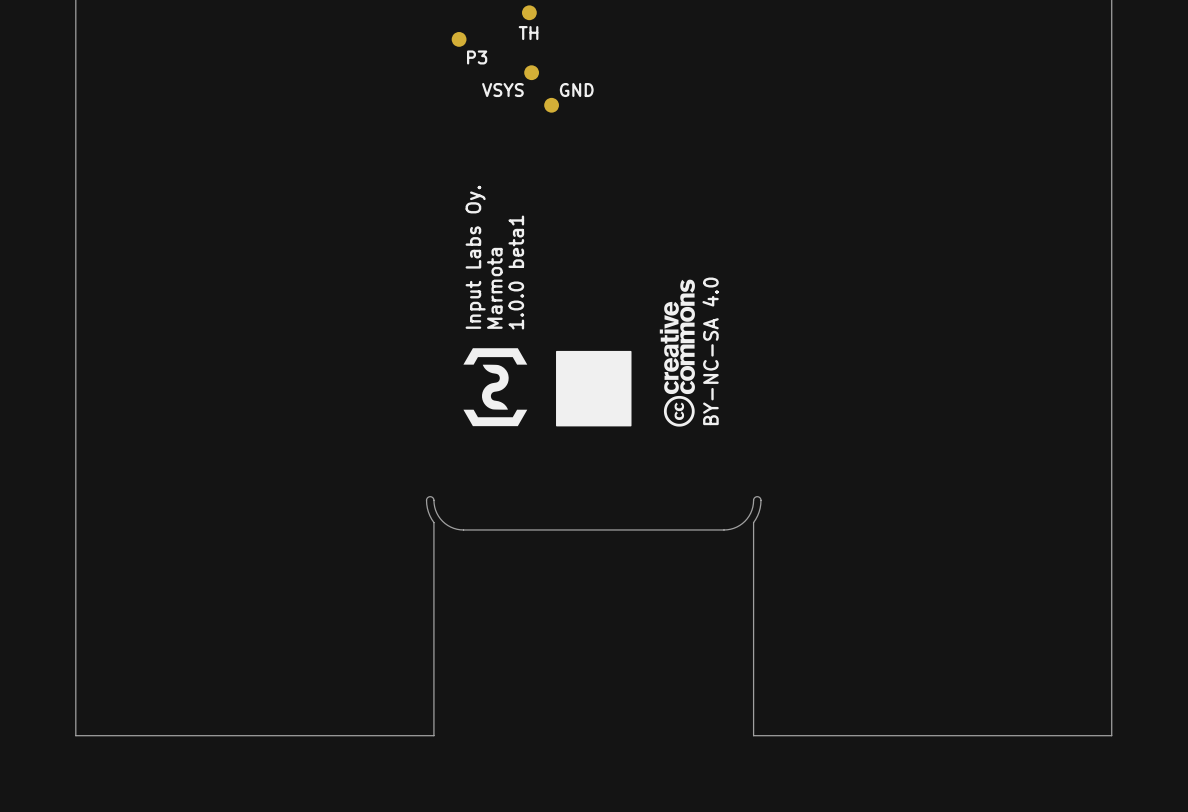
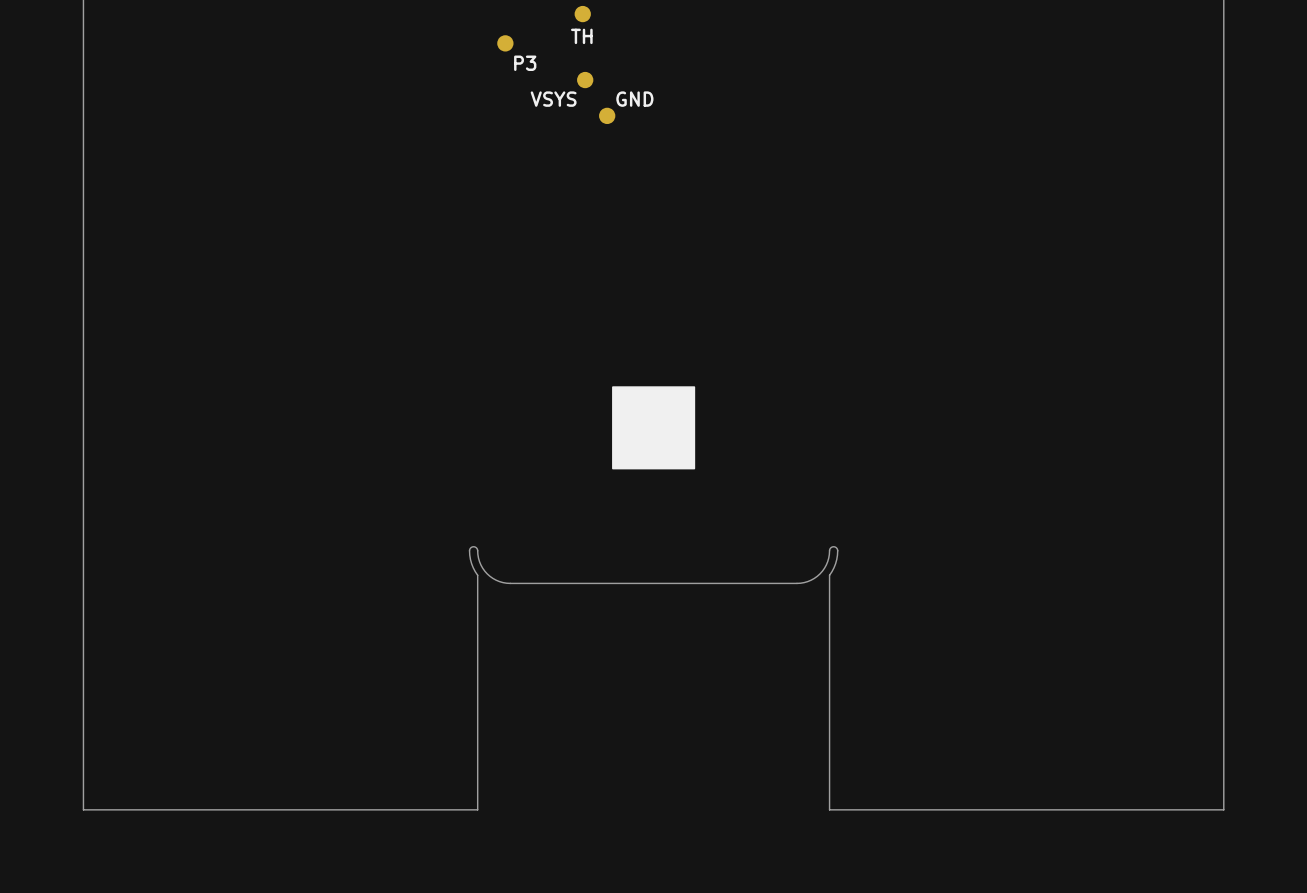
text: Input Labs Oy. (475, 257) -> none
text: 1.0.0 beta1 (516, 272) -> none
drawing: [659, 279, 695, 427] -> none
text: Marmota (494, 288) -> none
drawing: [463, 348, 528, 427] -> none
text: BY-NC-SA 4.0 (710, 351) -> none

